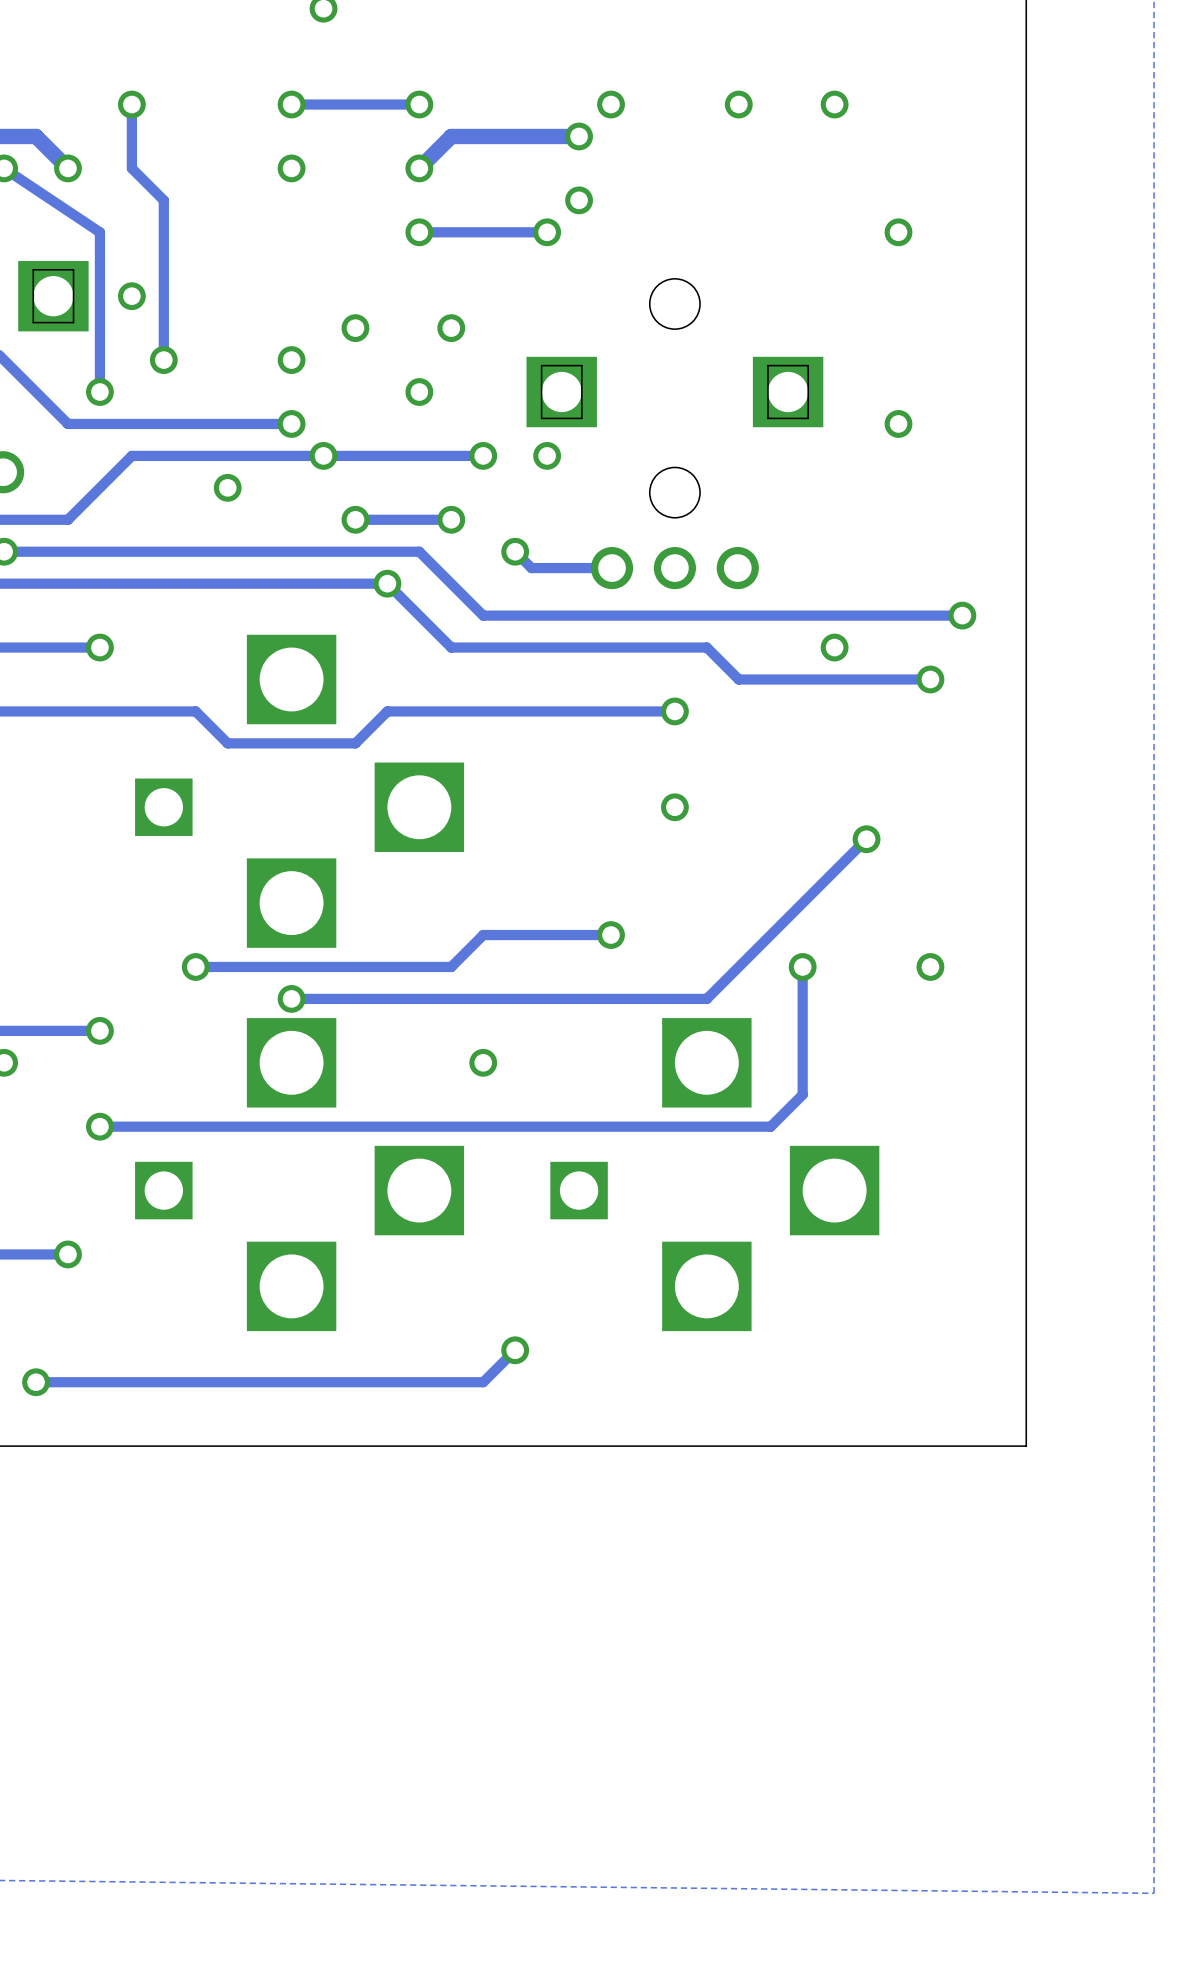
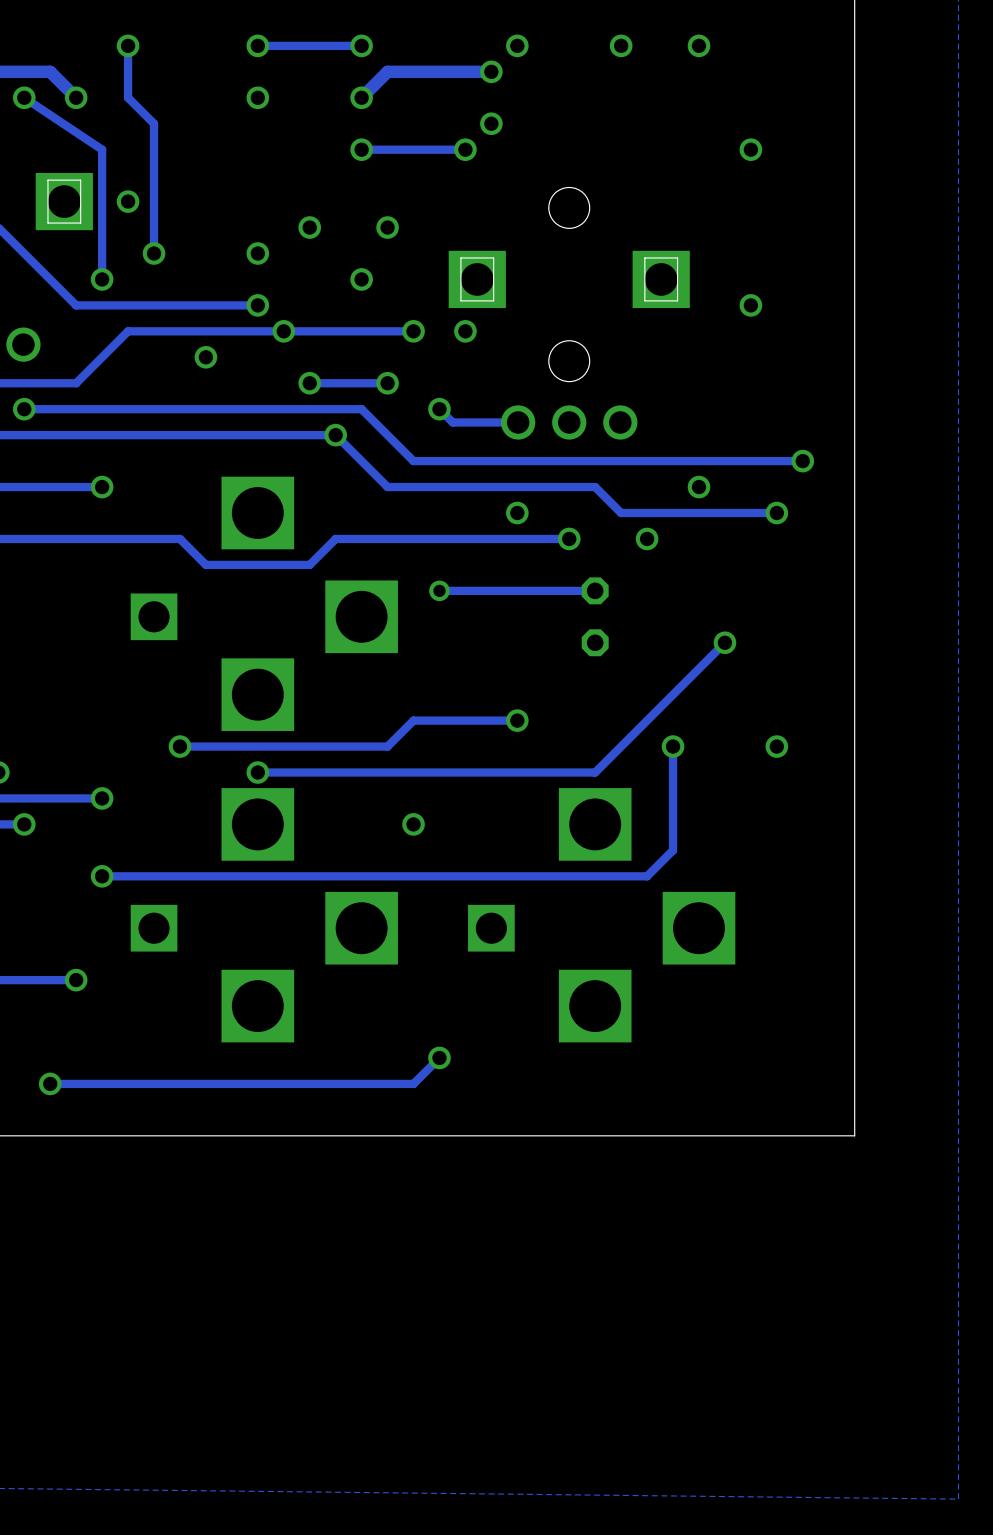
via: none -> (517, 513)
via: none -> (647, 538)
via: none -> (439, 590)
track: none -> (595, 590) (439, 590)
via: (674, 807) -> none
part: none -> (595, 616)

